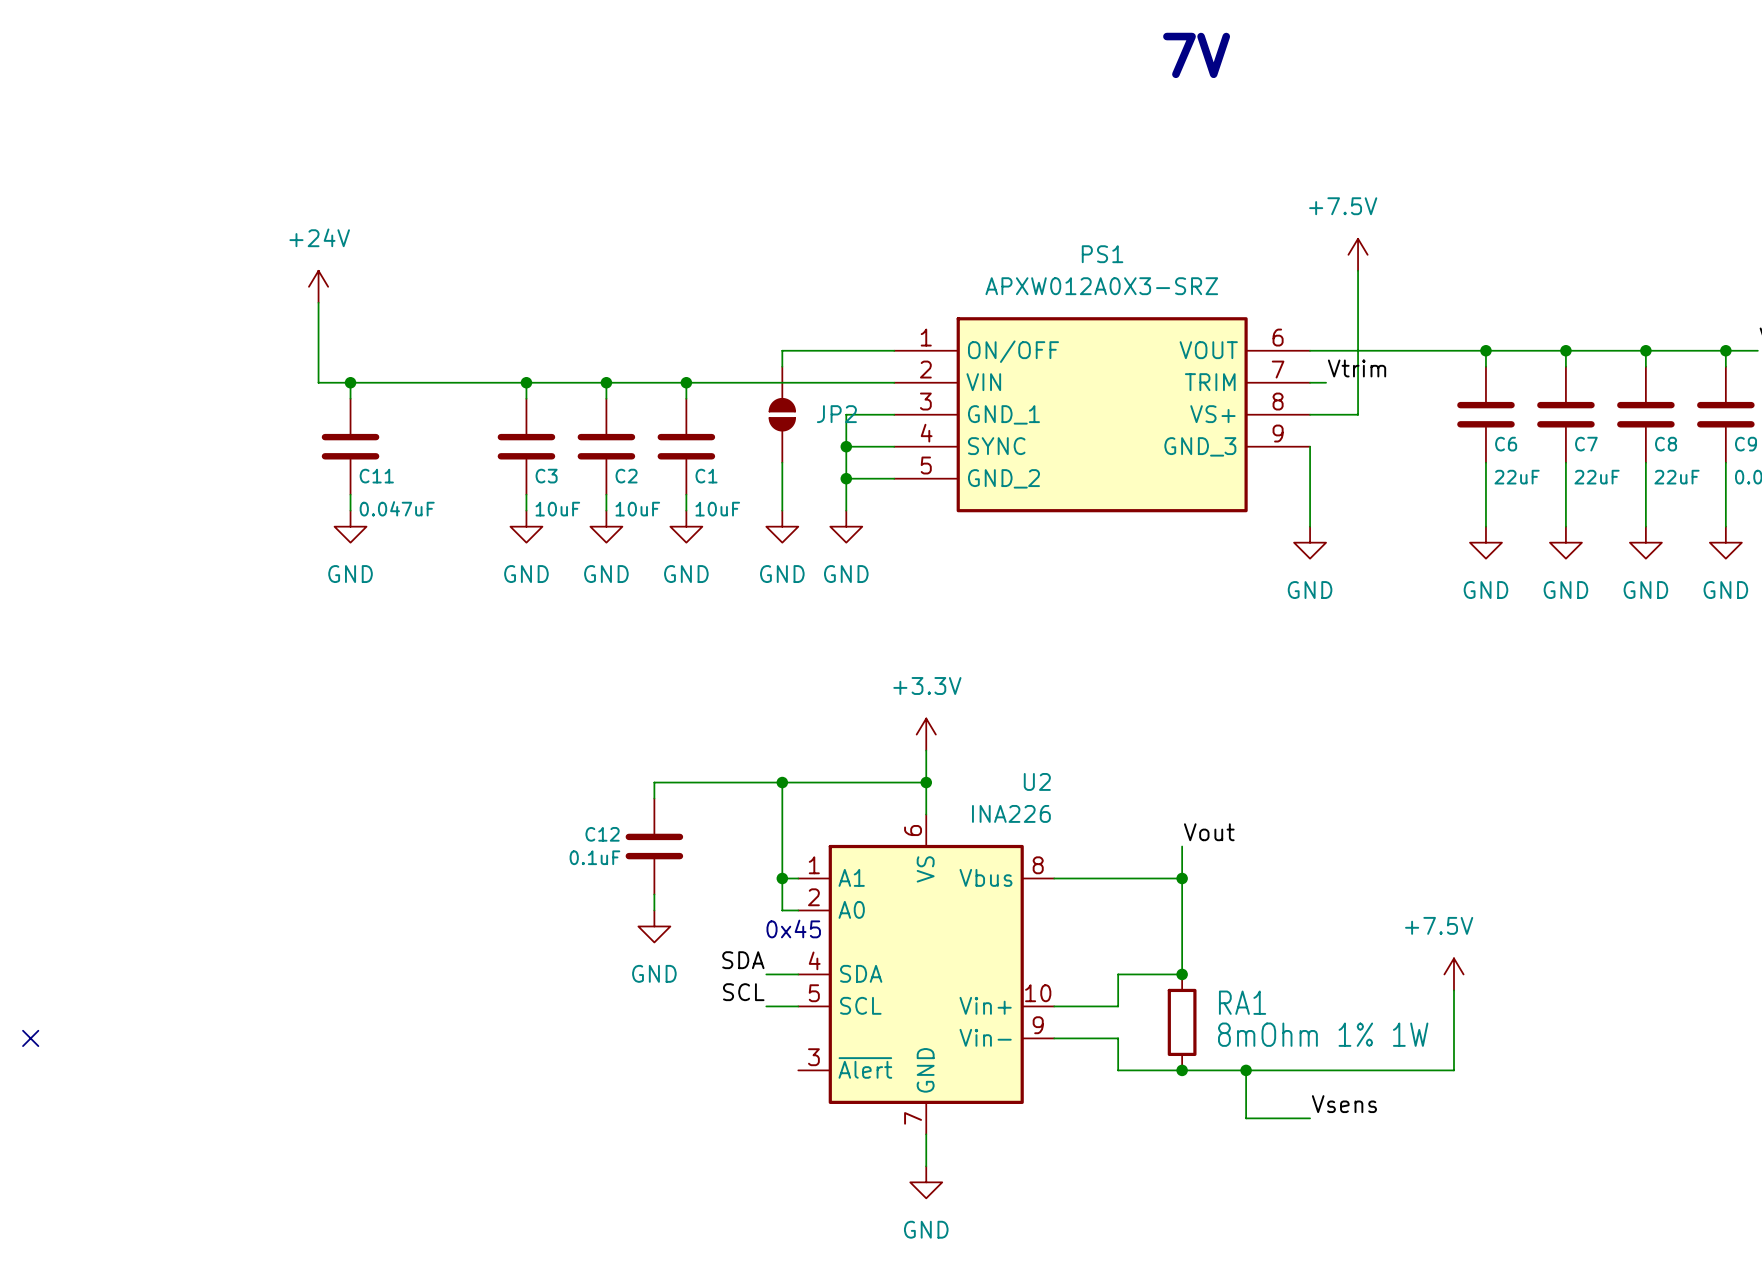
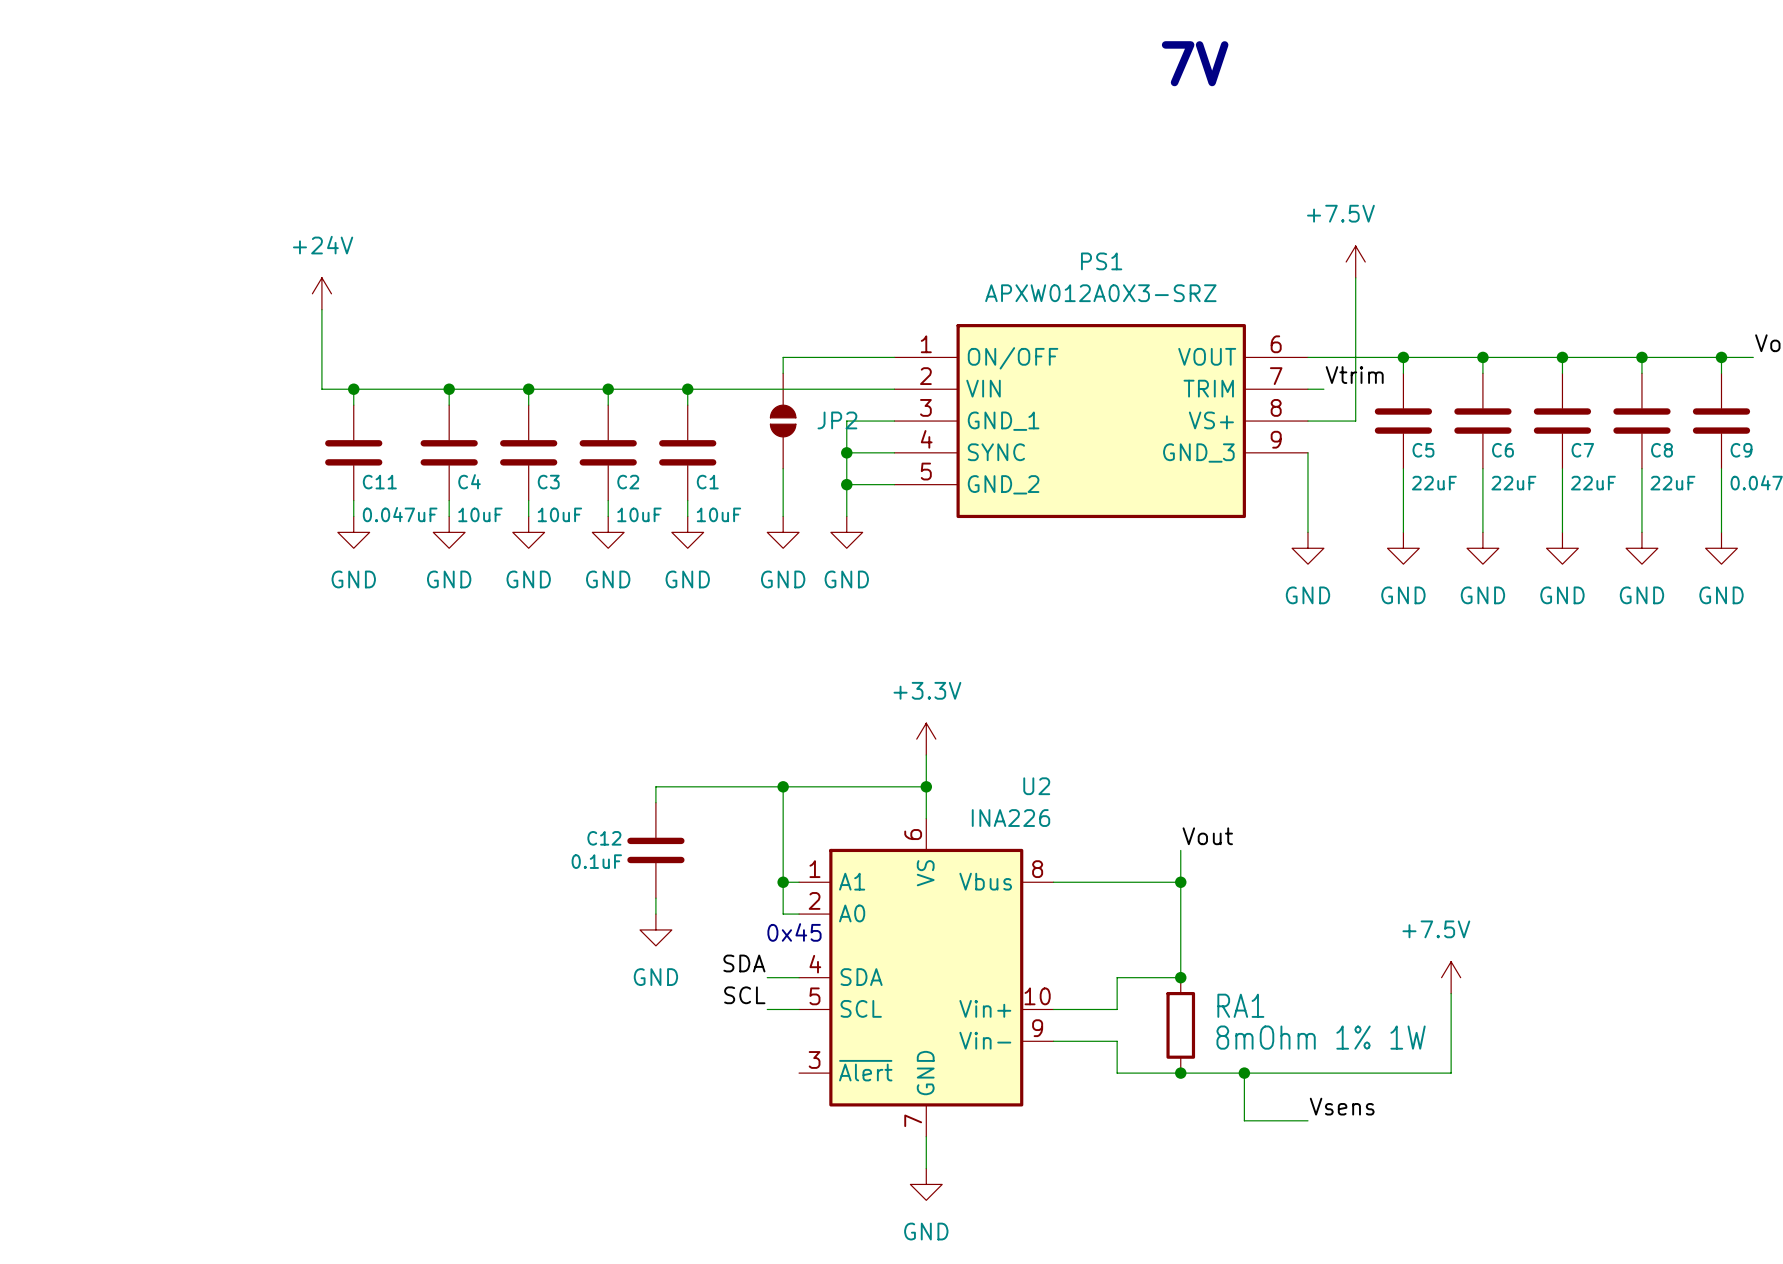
wire: none -> (1403, 357) (1403, 373)
junction: none -> (1403, 357)
wire: none -> (449, 389) (449, 405)
junction: none -> (449, 389)
C5: none -> 22uF (1403, 421)
C4: none -> 10uF (449, 452)
wire: none -> (1403, 468) (1403, 532)
wire: none -> (449, 500) (449, 516)
power symbol: none -> GND (449, 532)
power symbol: none -> GND (1403, 548)
no-connect mark: (30, 1038) -> none

